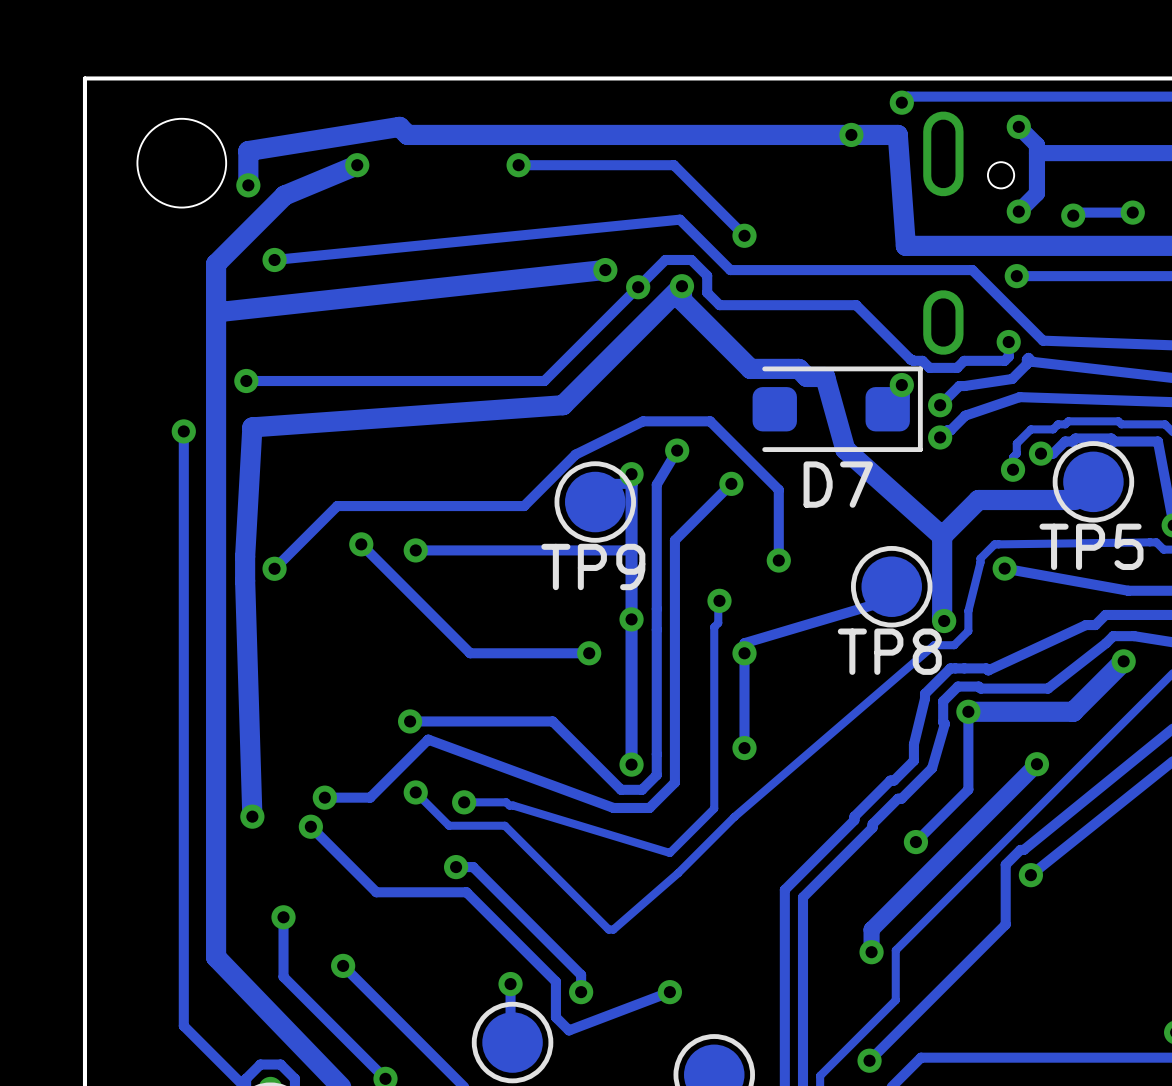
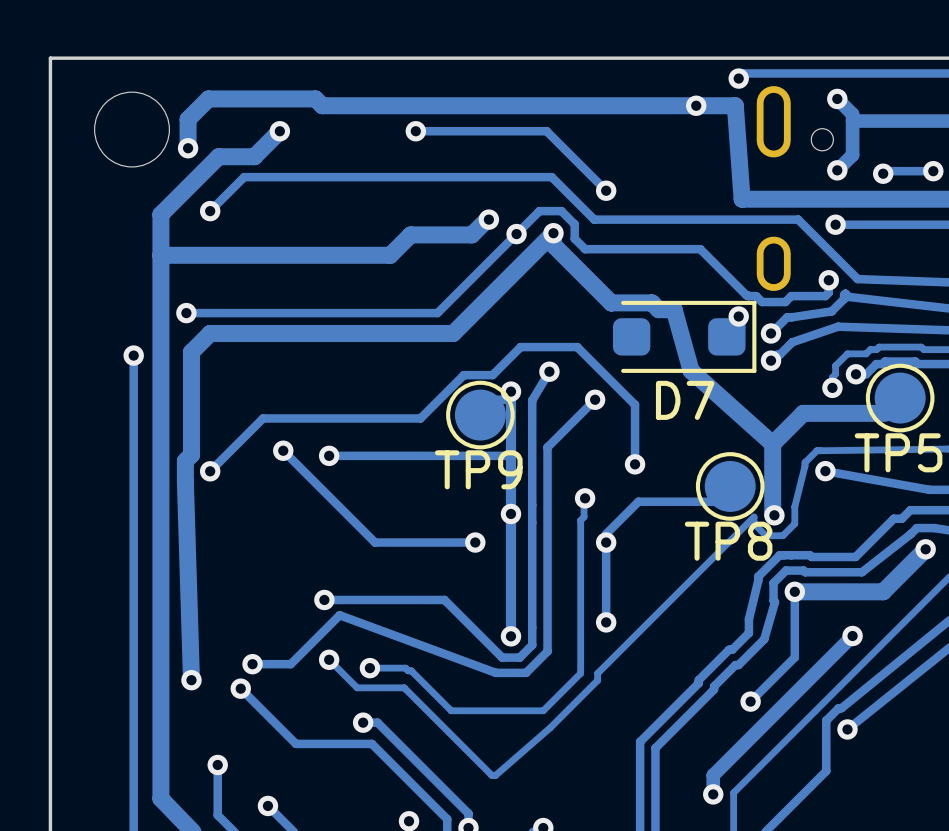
track: (399, 126) (248, 151) -> (315, 98) (208, 98) (188, 119)
track: (357, 165) (284, 195) -> (279, 131) (254, 156) (218, 156)
track: (679, 219) (274, 259) -> (551, 177) (244, 177) (210, 211)
track: (603, 270) (216, 312) -> (487, 219) (471, 234) (410, 234) (390, 255) (160, 255)
track: (562, 405) (252, 427) (245, 556) -> (453, 333) (210, 333) (191, 352) (191, 454) (185, 461)
track: (643, 421) (575, 454) -> (520, 347) (492, 375) (463, 375)
track: (873, 604) (744, 643) -> (714, 501) (638, 501) (606, 534)
track: (1085, 625) (988, 670) -> (893, 518) (855, 556) (811, 556)
track: (934, 645) (734, 816) -> (765, 535) (754, 523) (754, 517) (597, 673) (597, 680)
track: (513, 805) (669, 852) -> (411, 670) (451, 710) (543, 710)

